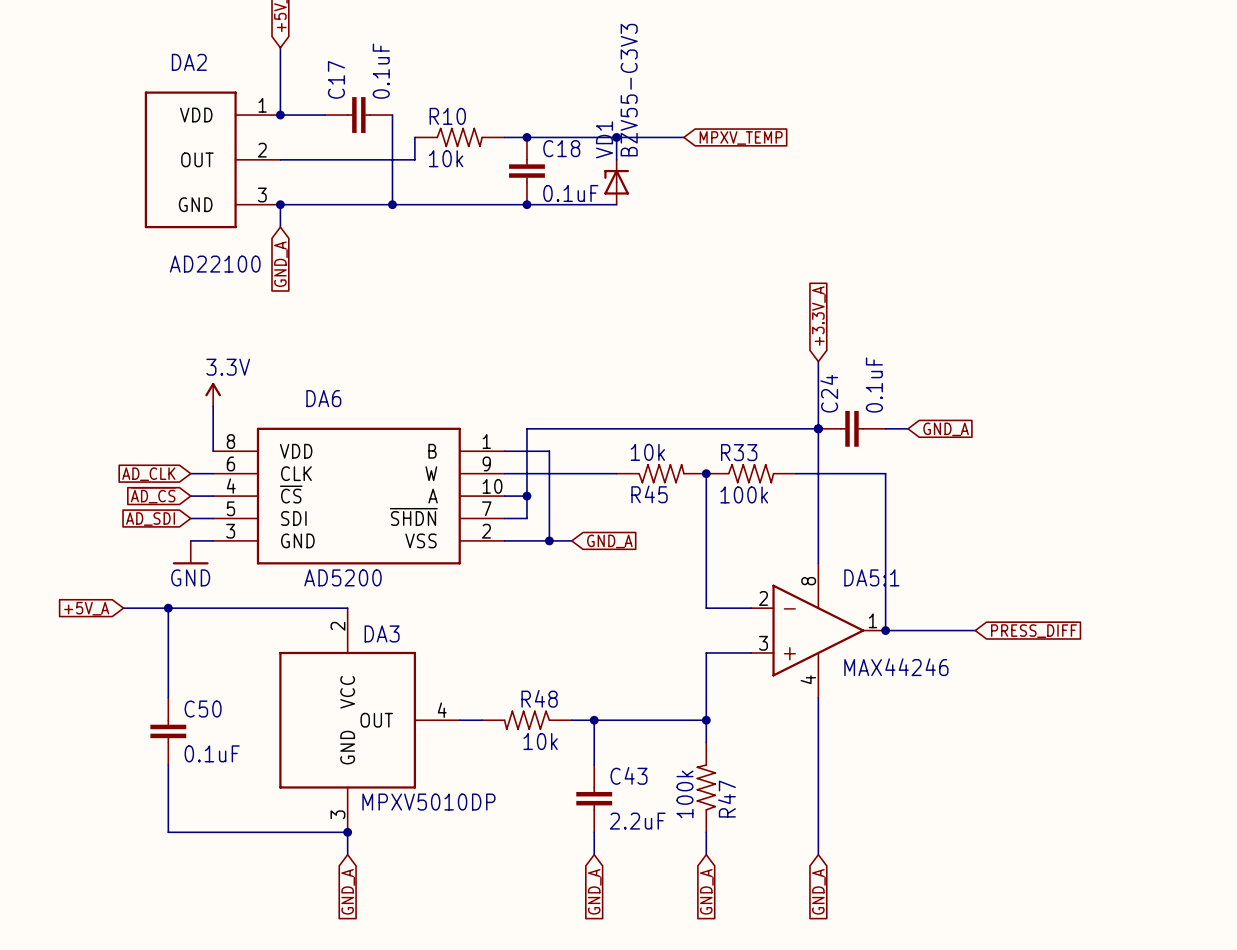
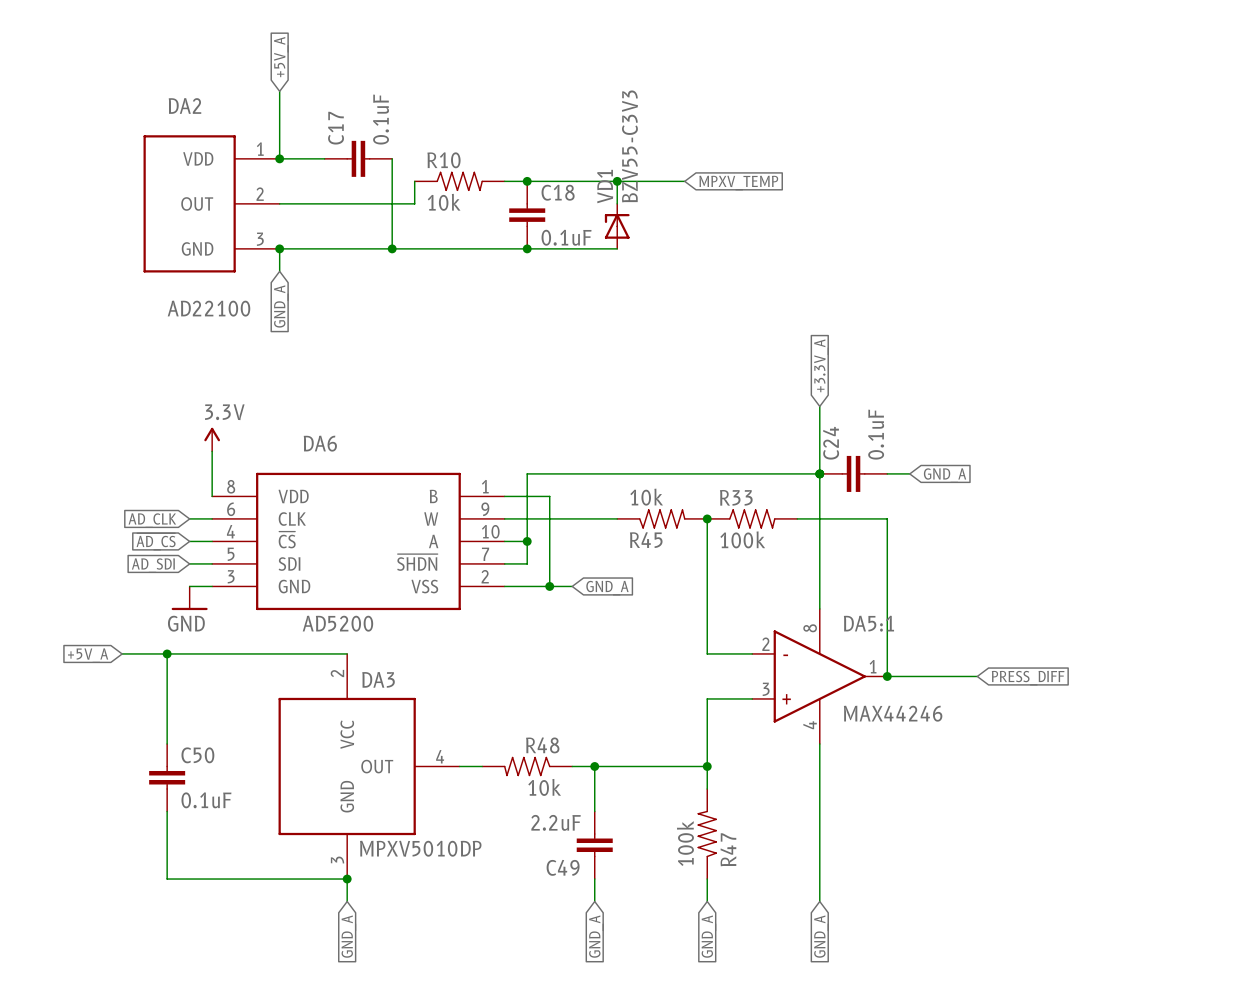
C43 name: C43 (629, 775) -> C49 (563, 867)
C43 value position: 2.2uF (637, 821) -> 2.2uF (556, 822)

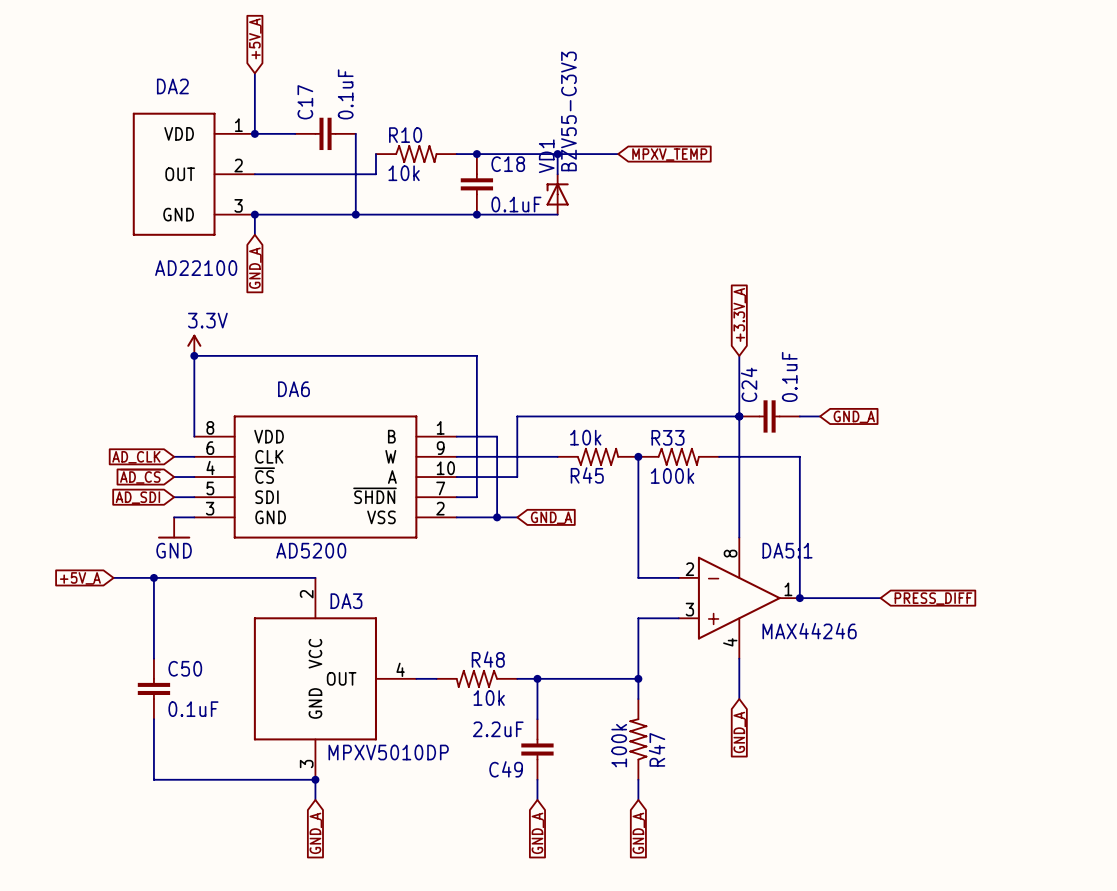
junction: none -> (194, 355)
power symbol position: 3.3V (212, 439) -> 3.3V (194, 345)
wire: none -> (194, 396) (194, 355) (476, 355) (476, 416)
wire: (527, 473) (572, 473) -> (476, 477) (517, 477) (517, 416)
junction: (527, 541) -> none
wire: (819, 788) (819, 901) -> none
global label position: GND_A (821, 936) -> GND_A (739, 732)

